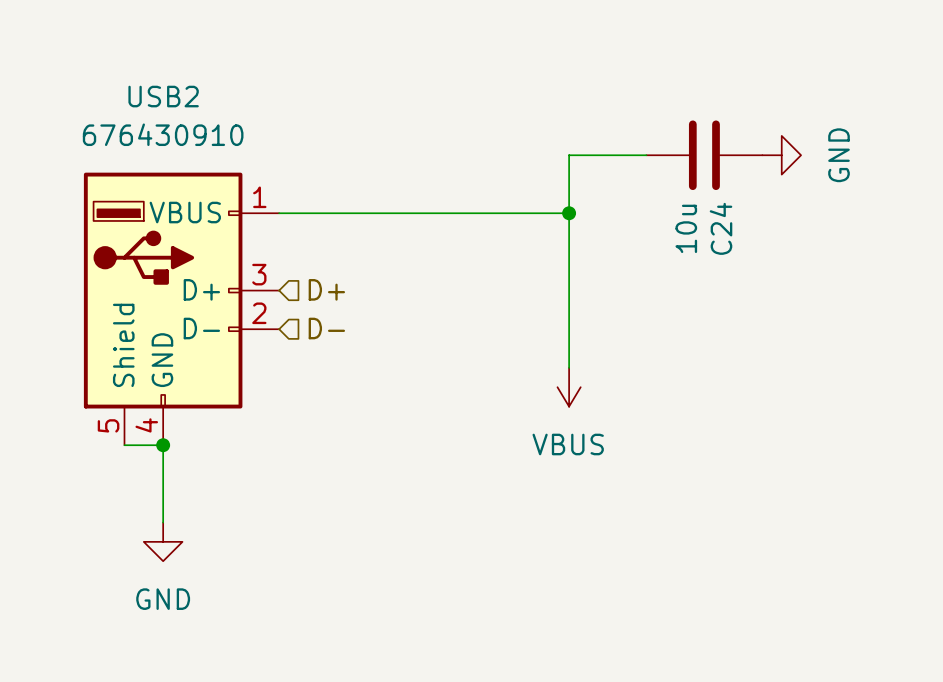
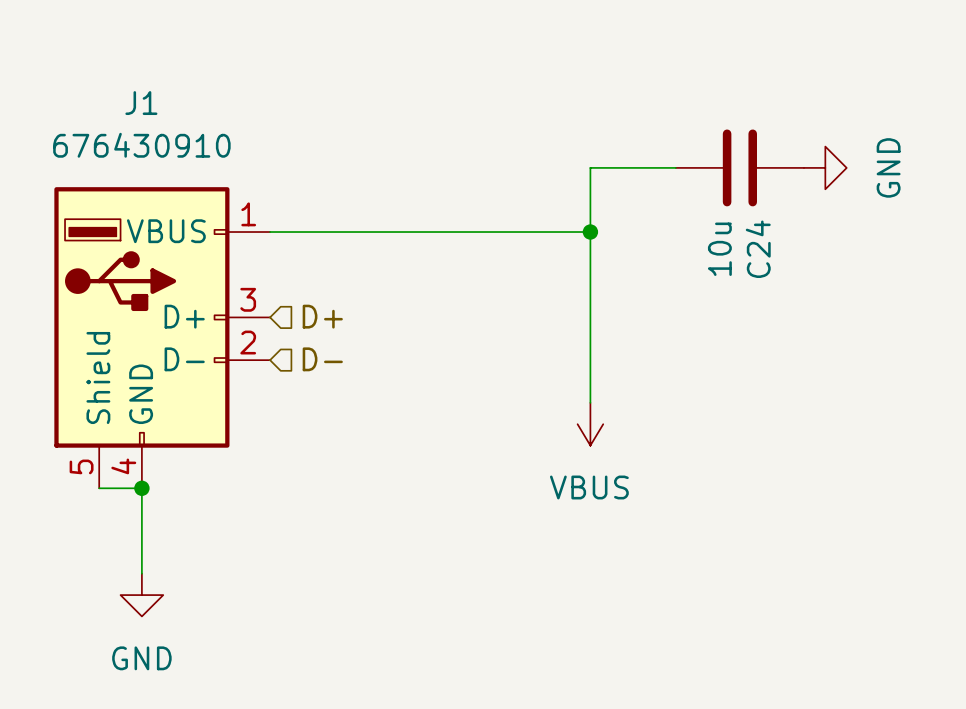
USB2 name: USB2 (163, 96) -> J1 (141, 103)

